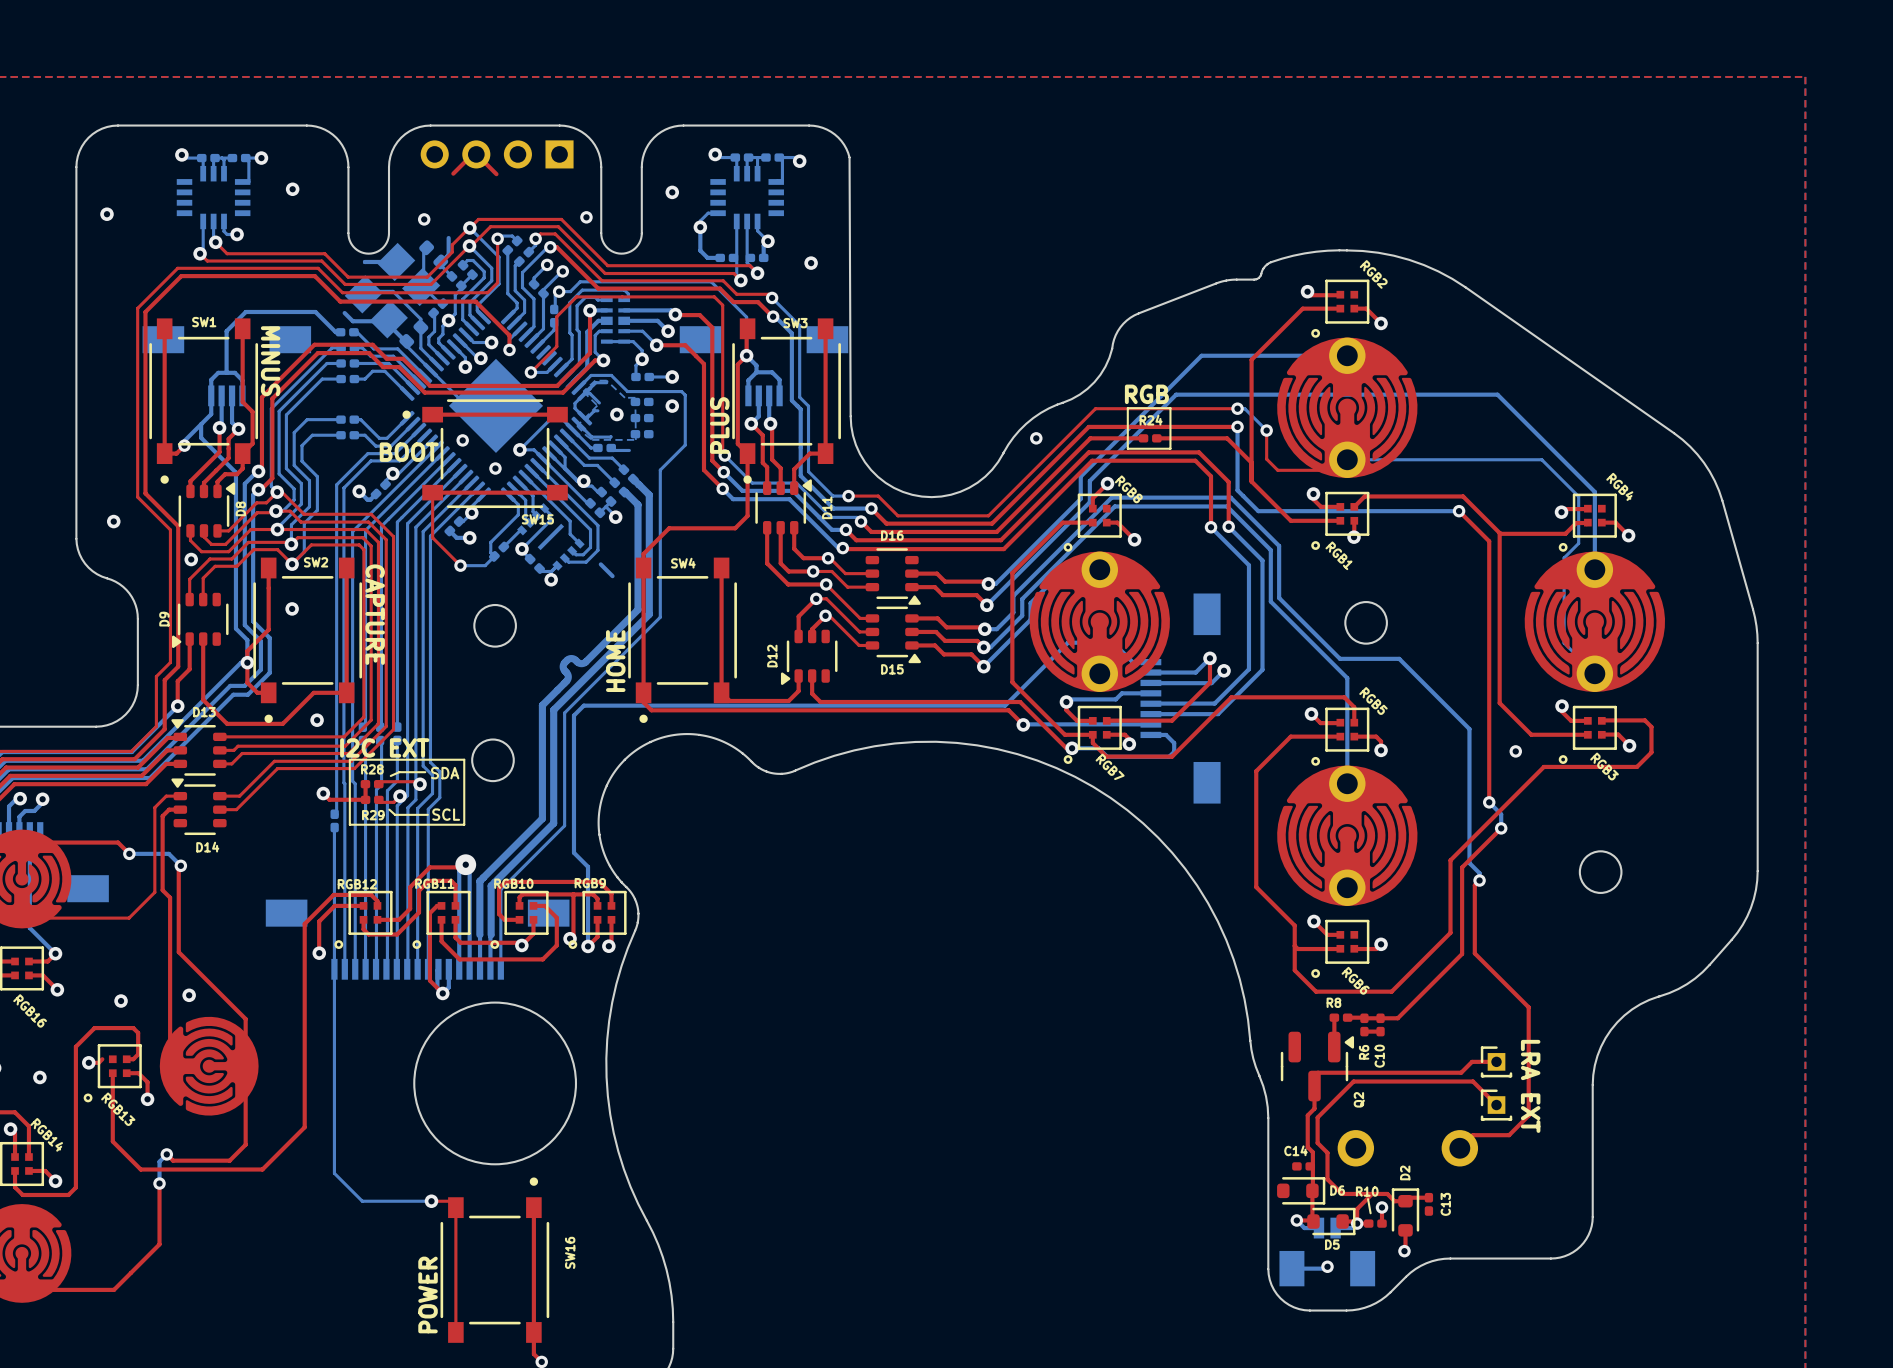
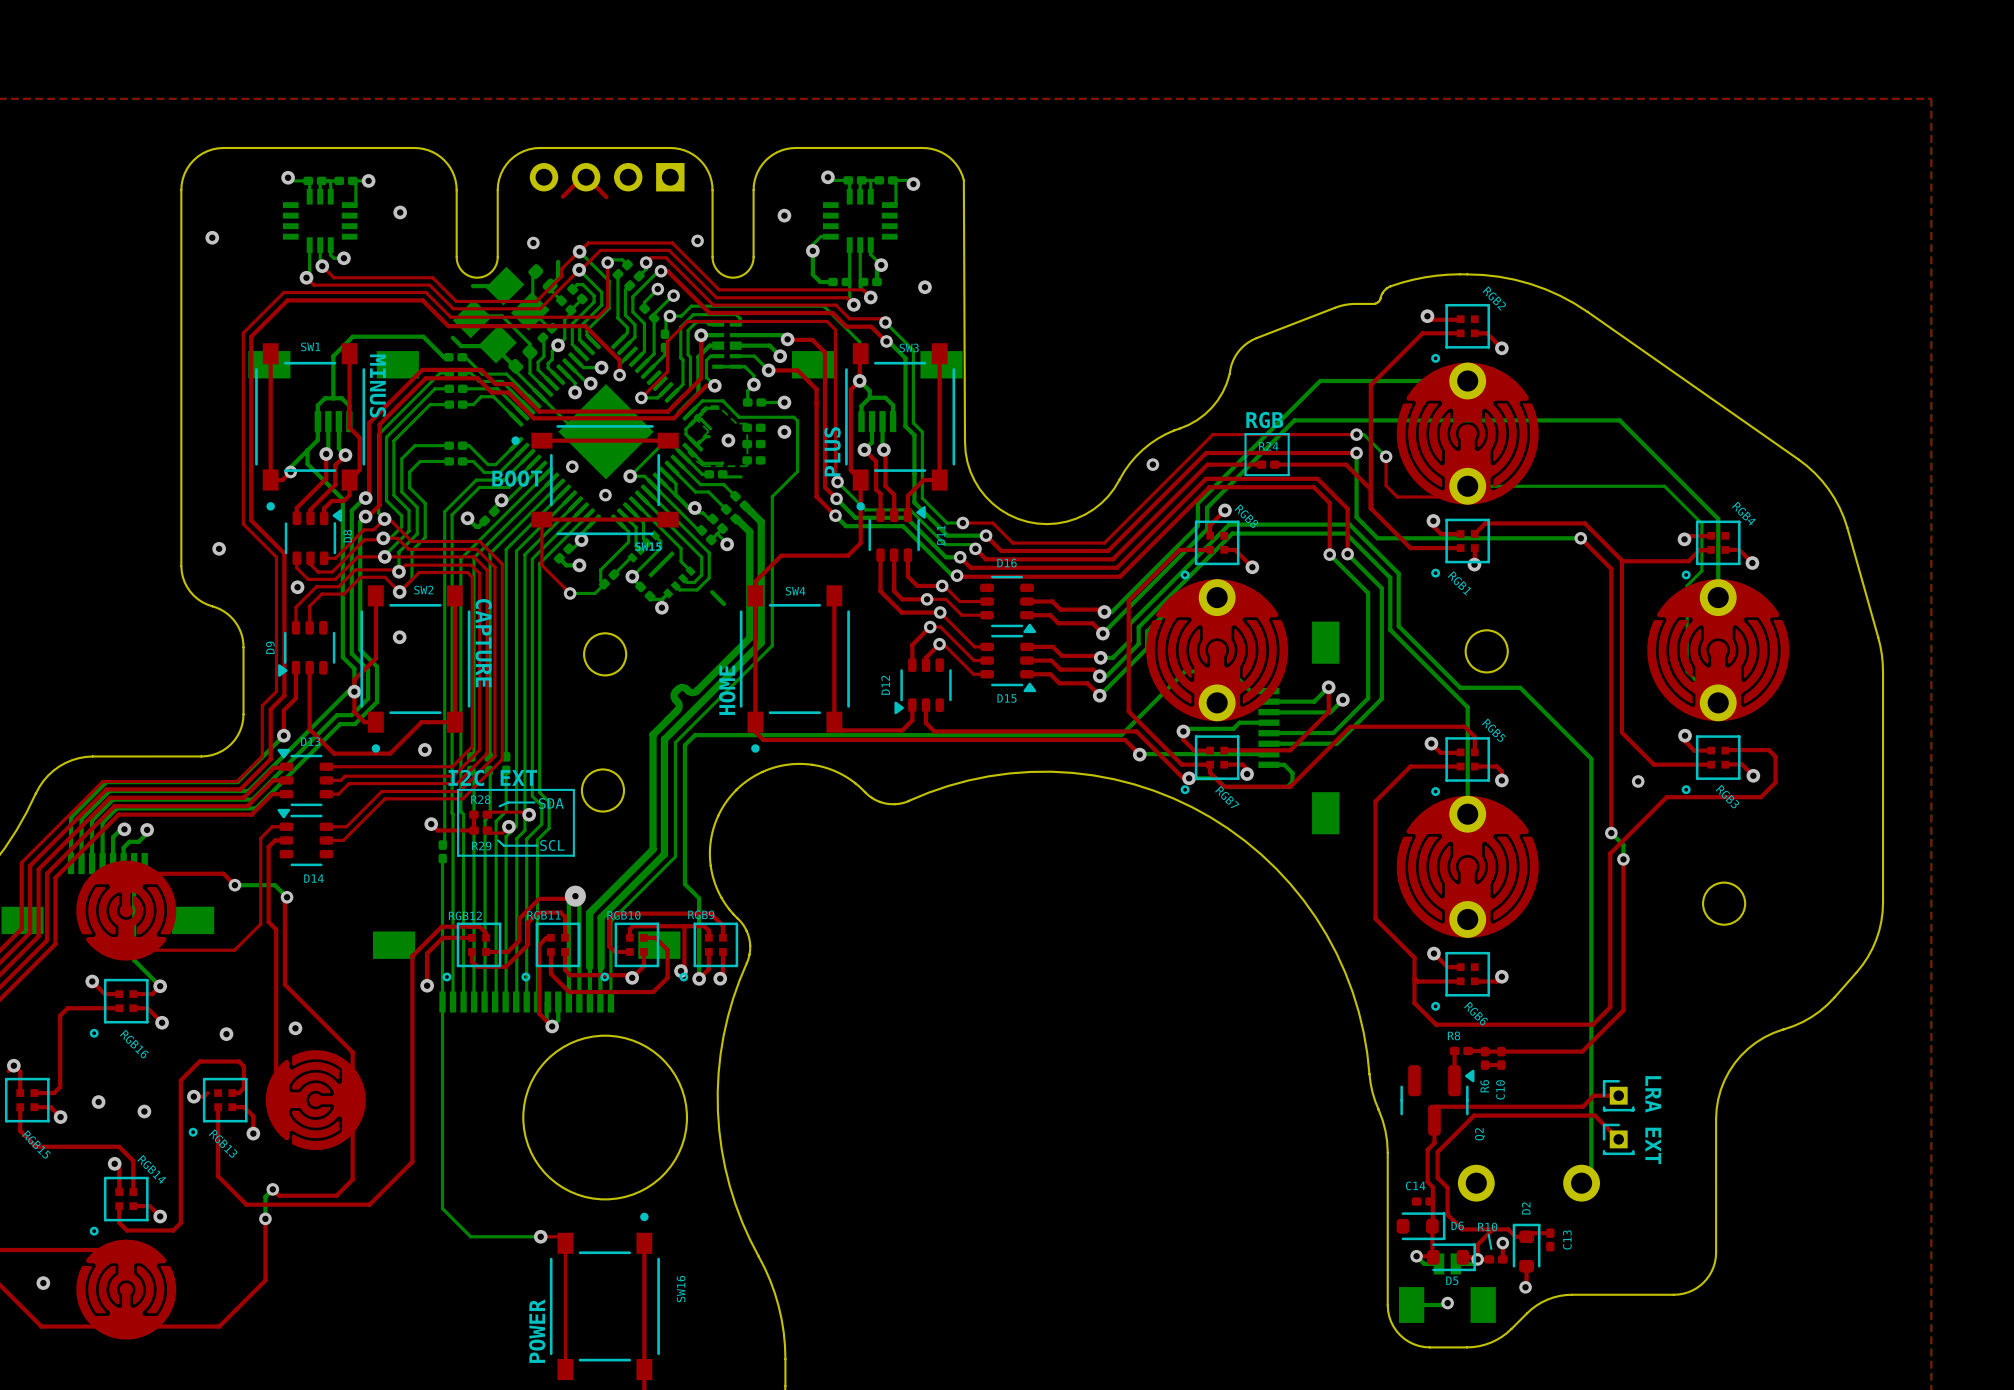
top track: (1488, 822) (1450, 860) (1450, 932) (1391, 991) -> (1610, 853) (1610, 1007) (1592, 1024) (1512, 1024)
top track: (1501, 828) (1462, 867) (1462, 953) (1397, 1018) -> (1623, 859) (1623, 1010) (1582, 1051) (1518, 1051)
bottom track: (1469, 863) (1479, 873) (1479, 880) -> (1591, 894) (1591, 1173)
top track: (1479, 880) (1474, 885) (1474, 953) (1528, 1007) (1528, 1115) (1509, 1135) (1472, 1135) (1459, 1148) -> none
via: (1479, 880) -> none

